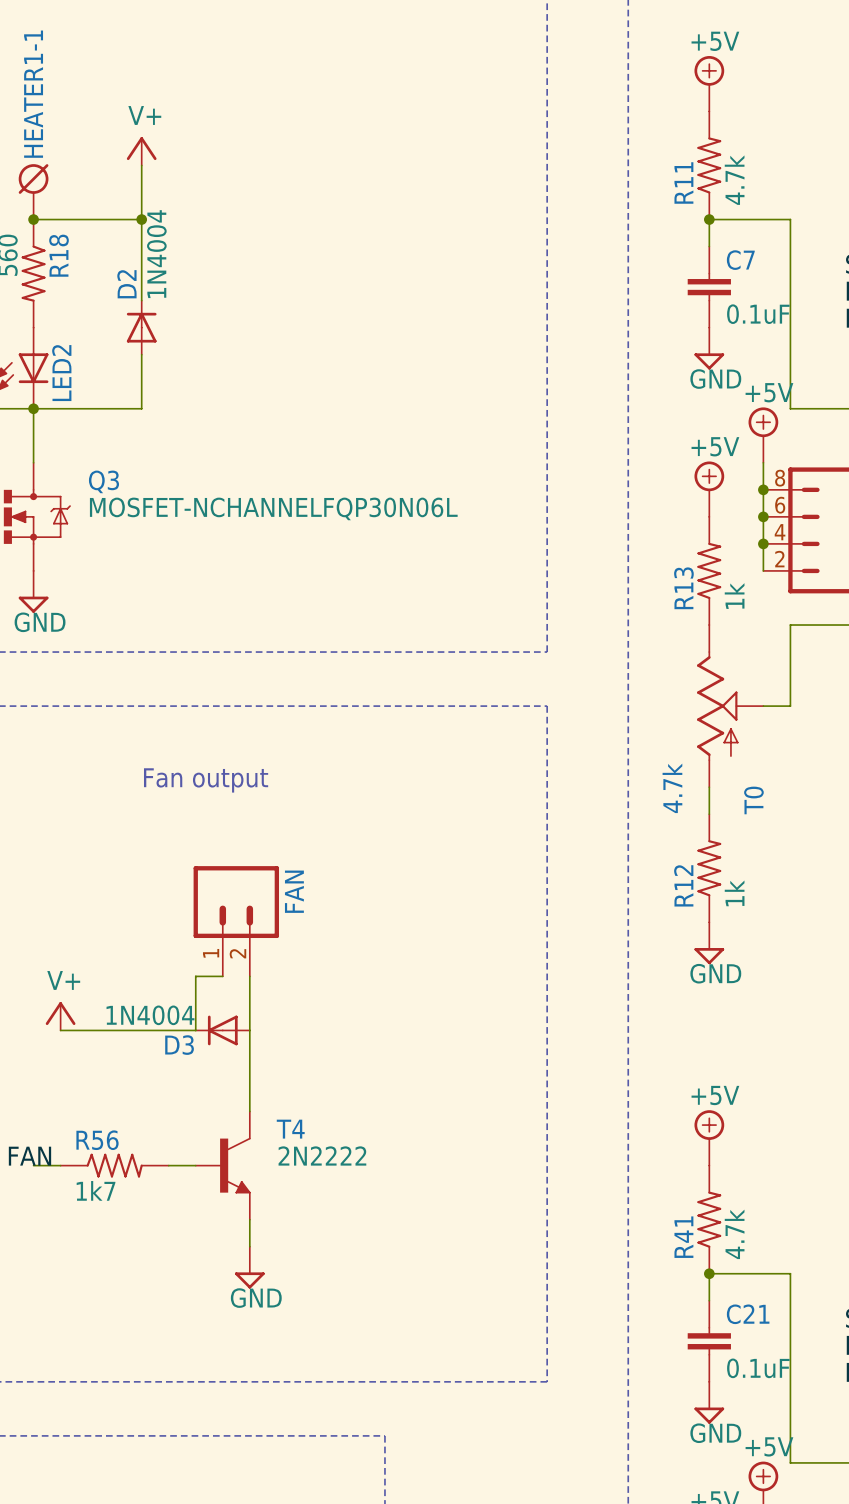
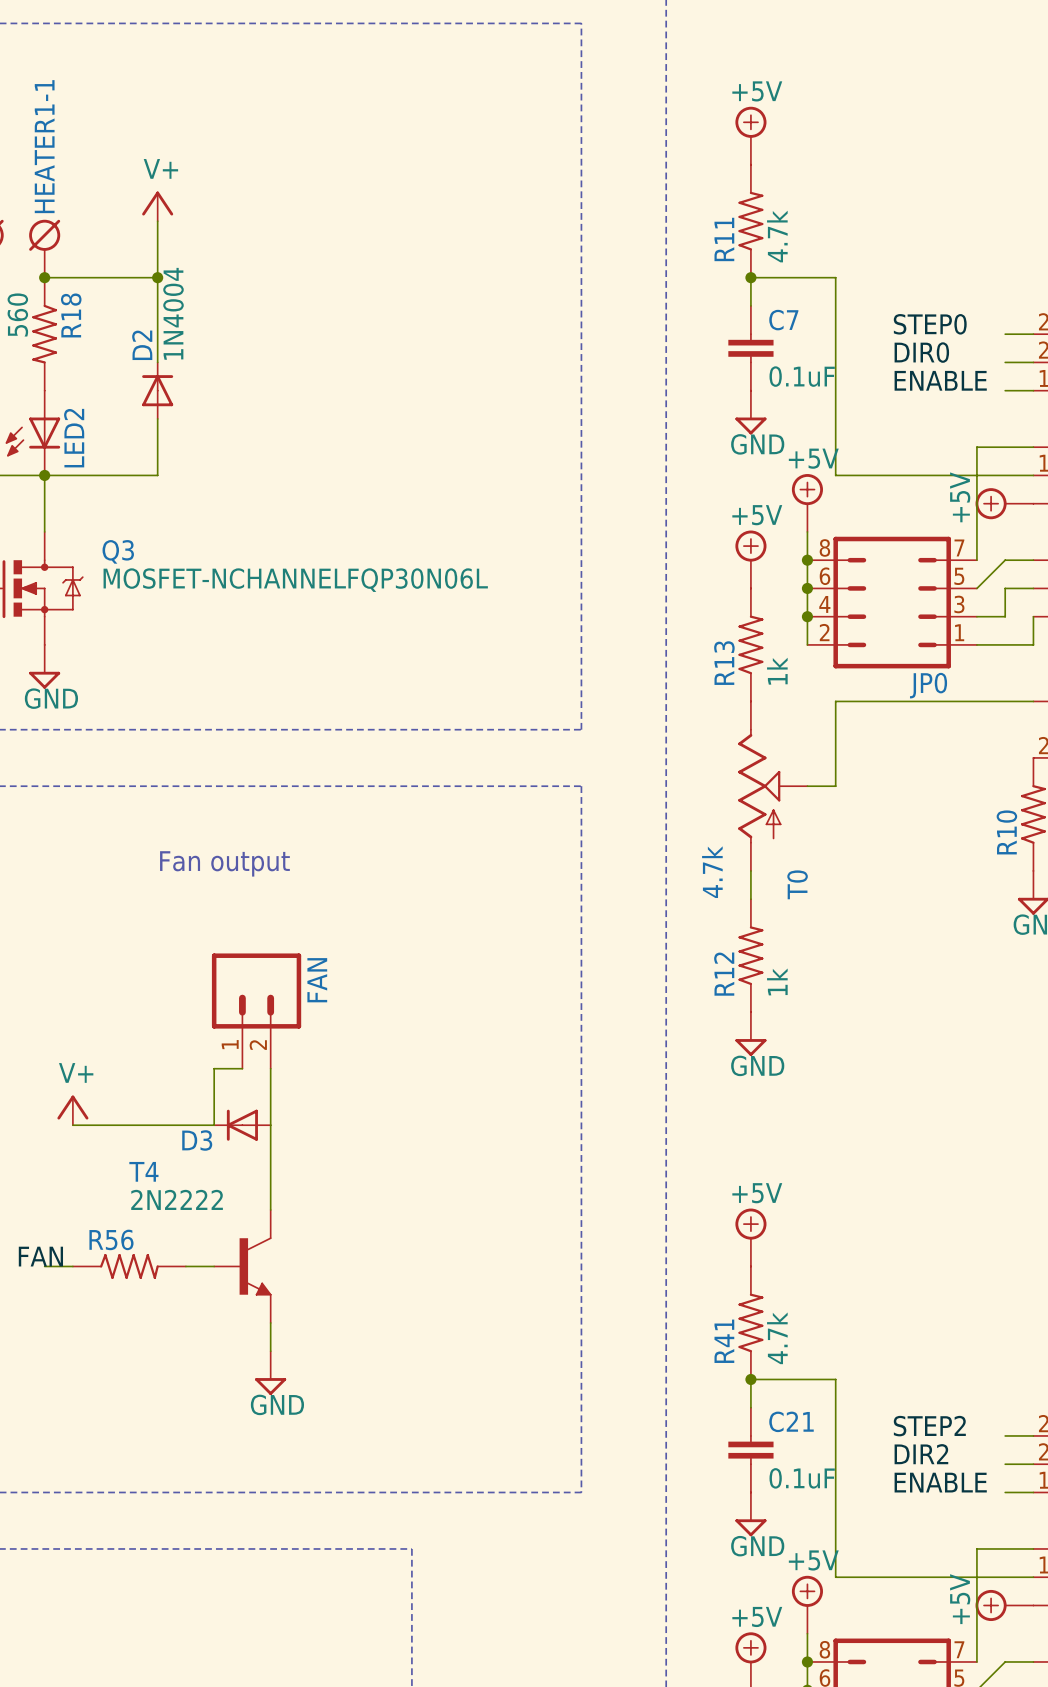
D3 value: 1N4004 (150, 1015) -> none
T4 name position: T4 (290, 1129) -> T4 (143, 1171)
T4 value position: 2N2222 (322, 1155) -> 2N2222 (177, 1199)
R56 value: 1k7 (96, 1190) -> none

